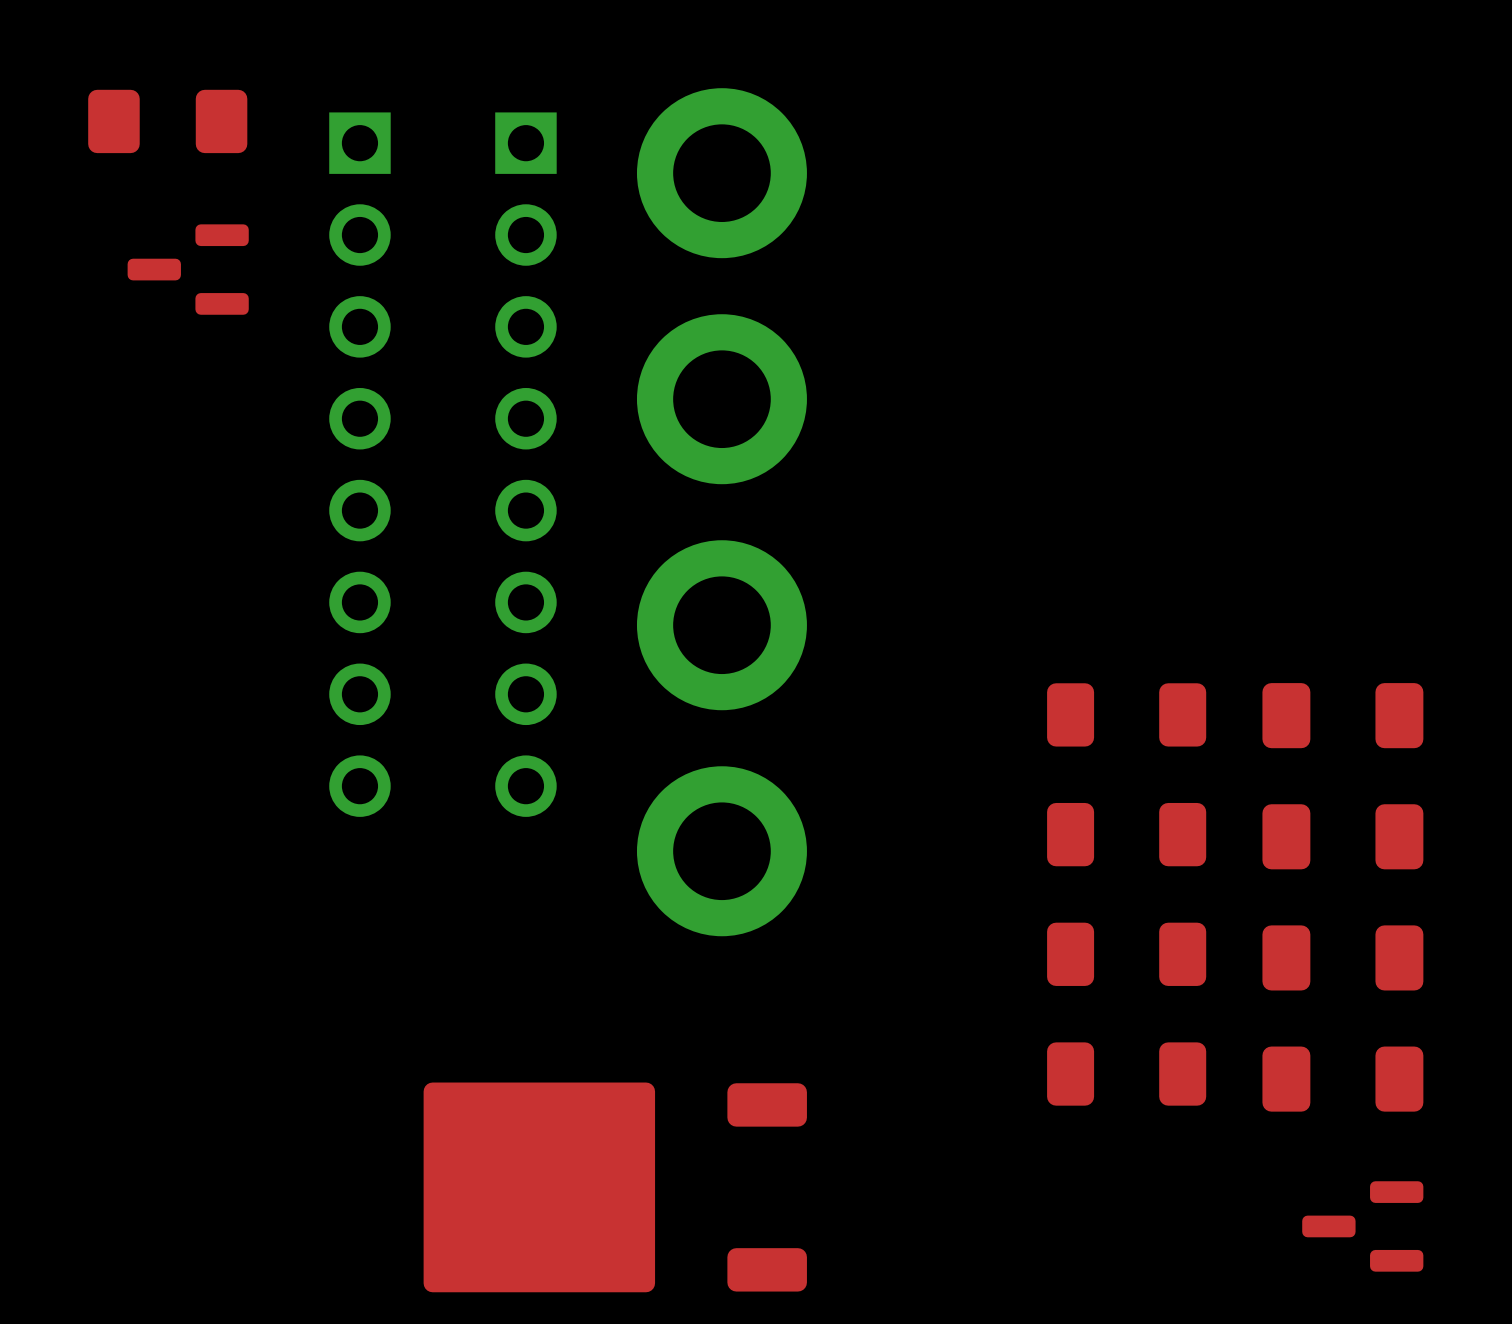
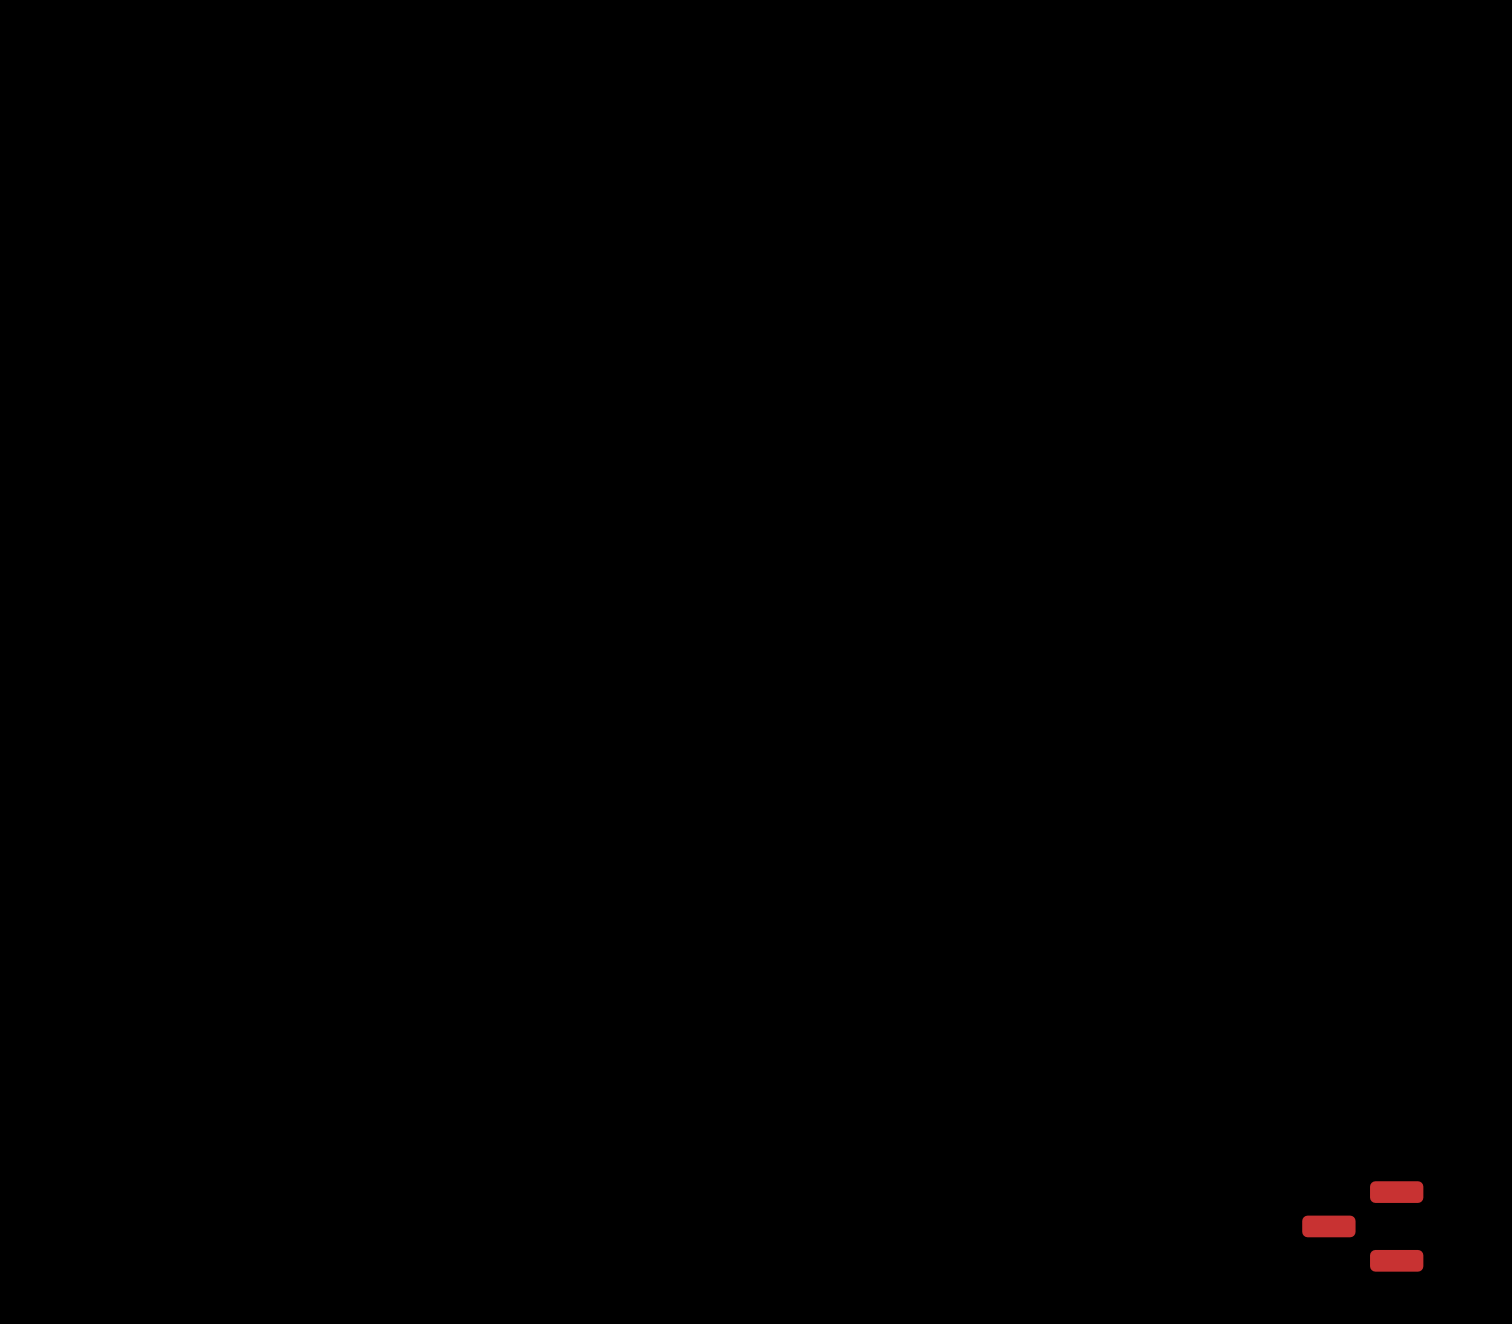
part: (167, 121) -> none
part: (721, 173) -> none
part: (188, 269) -> none
part: (721, 399) -> none
part: (359, 464) -> none
part: (525, 464) -> none
part: (721, 625) -> none
part: (1126, 714) -> none
part: (1342, 715) -> none
part: (1126, 834) -> none
part: (1342, 836) -> none
part: (721, 851) -> none
part: (1126, 954) -> none
part: (1342, 957) -> none
part: (1126, 1074) -> none
part: (1342, 1079) -> none
part: (615, 1187) -> none

